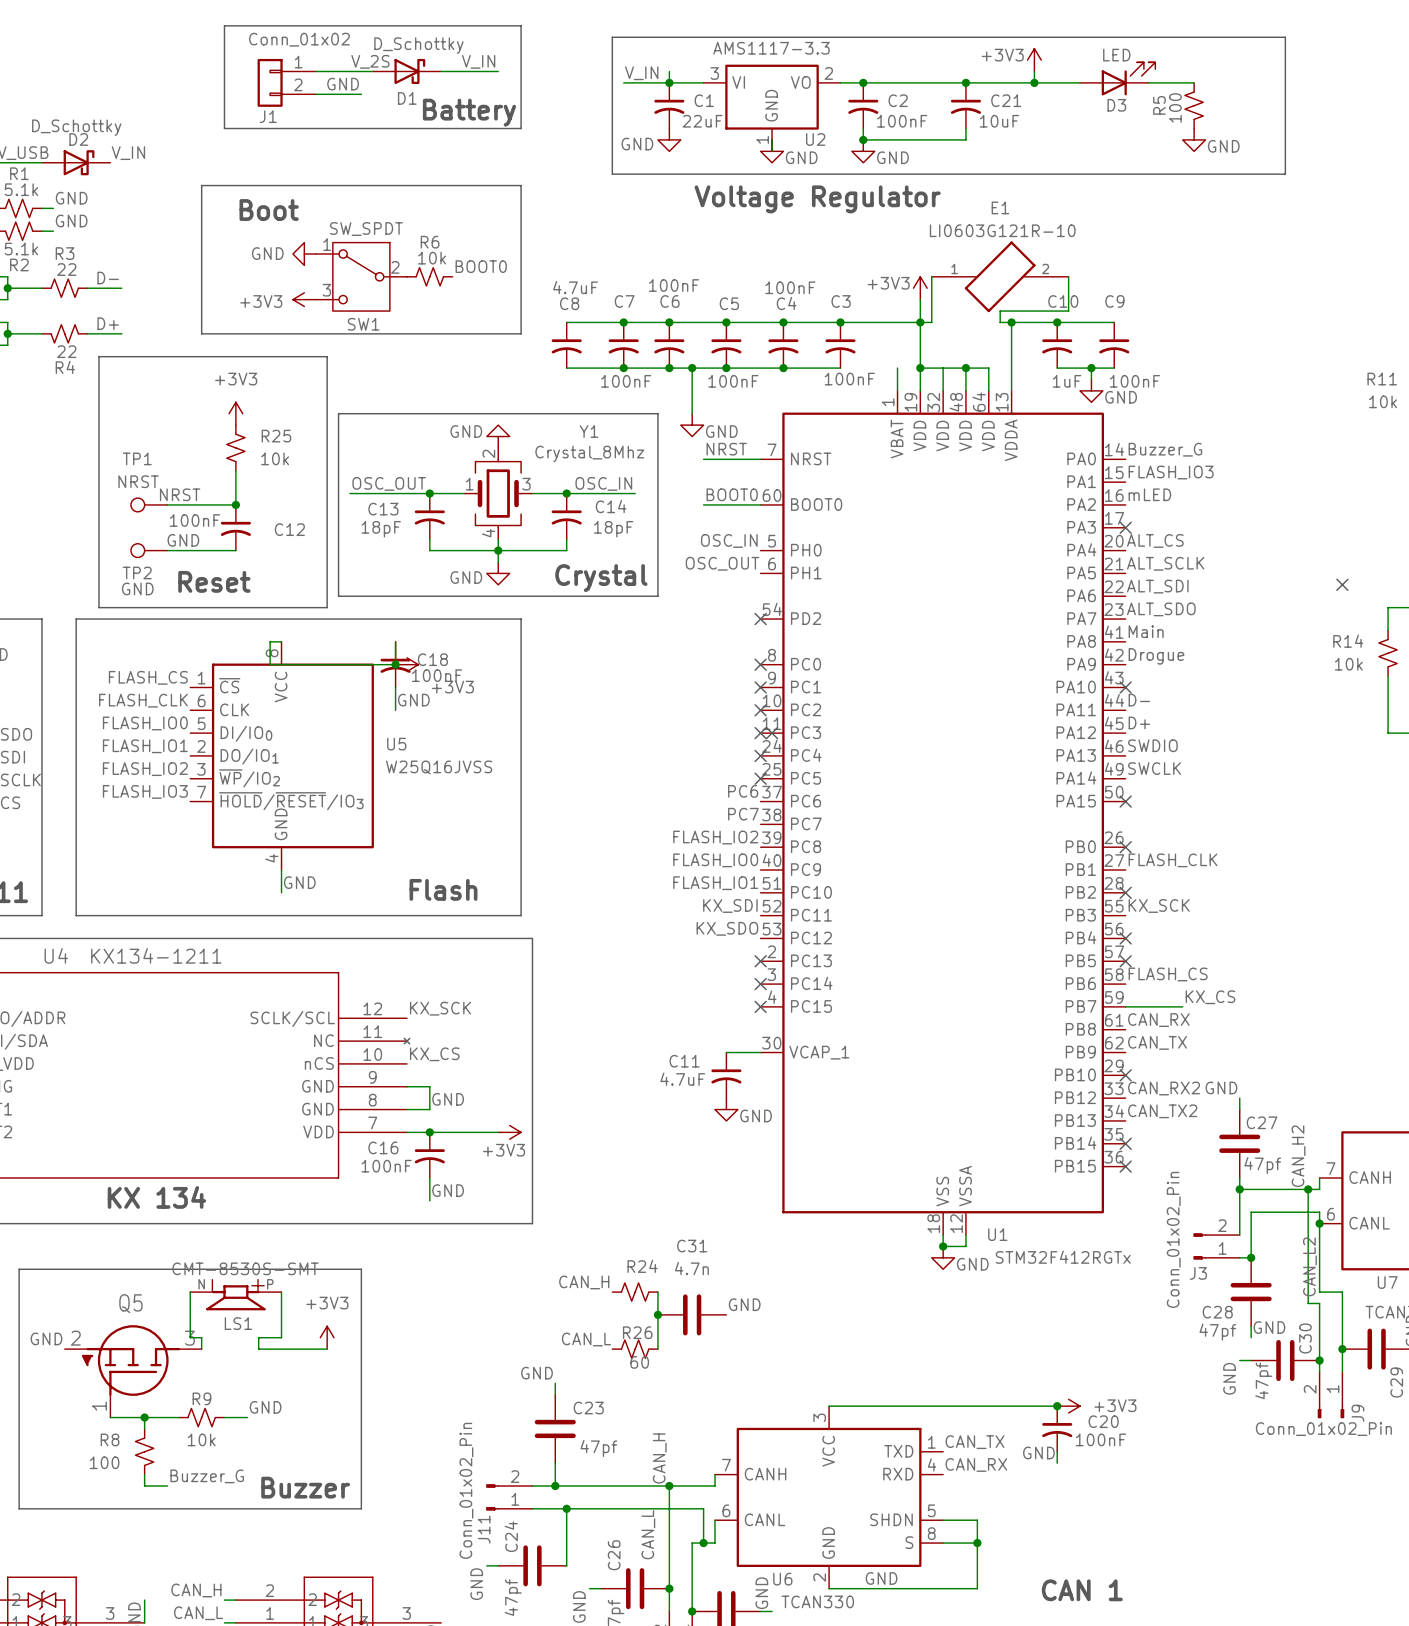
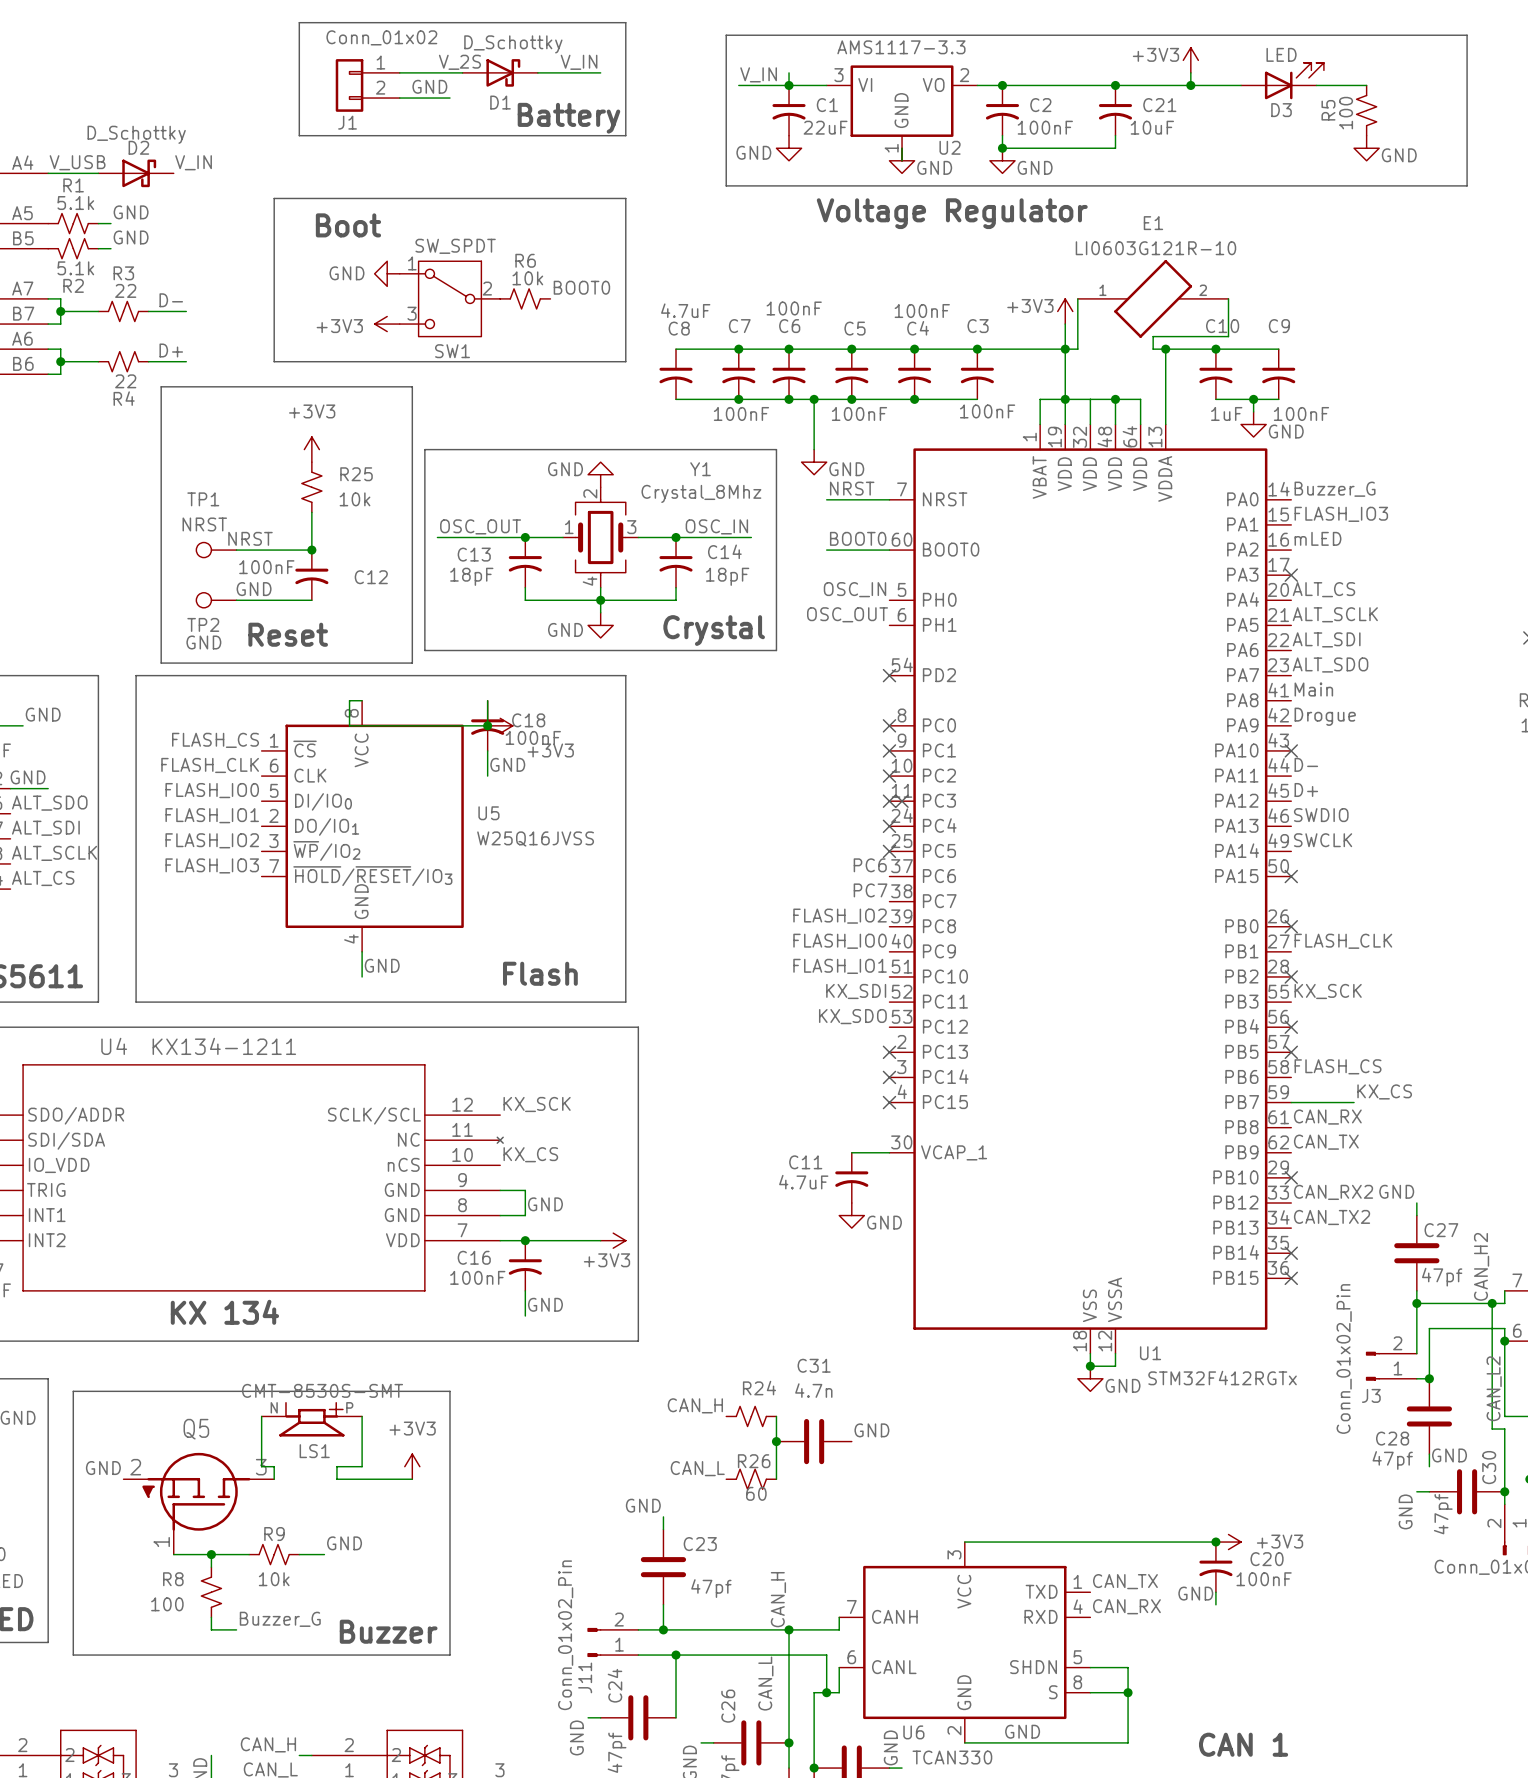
wire: none -> (1040, 399) (1065, 399)

